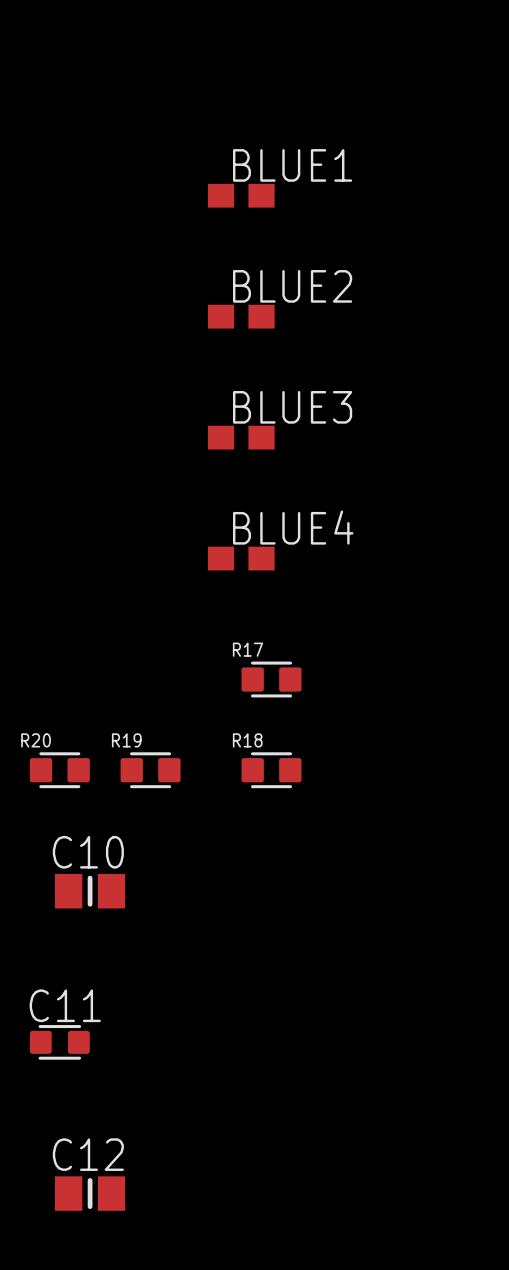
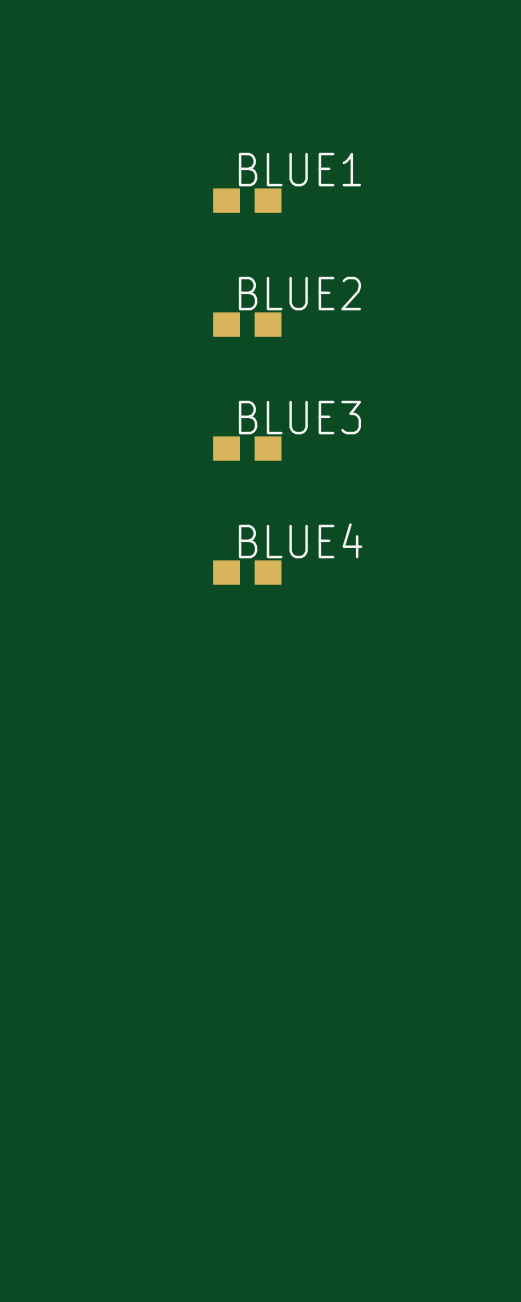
R17: (271, 679) -> none
R20: (59, 770) -> none
R19: (150, 770) -> none
R18: (271, 770) -> none
C10: (90, 891) -> none
C11: (59, 1042) -> none
C12: (90, 1193) -> none

